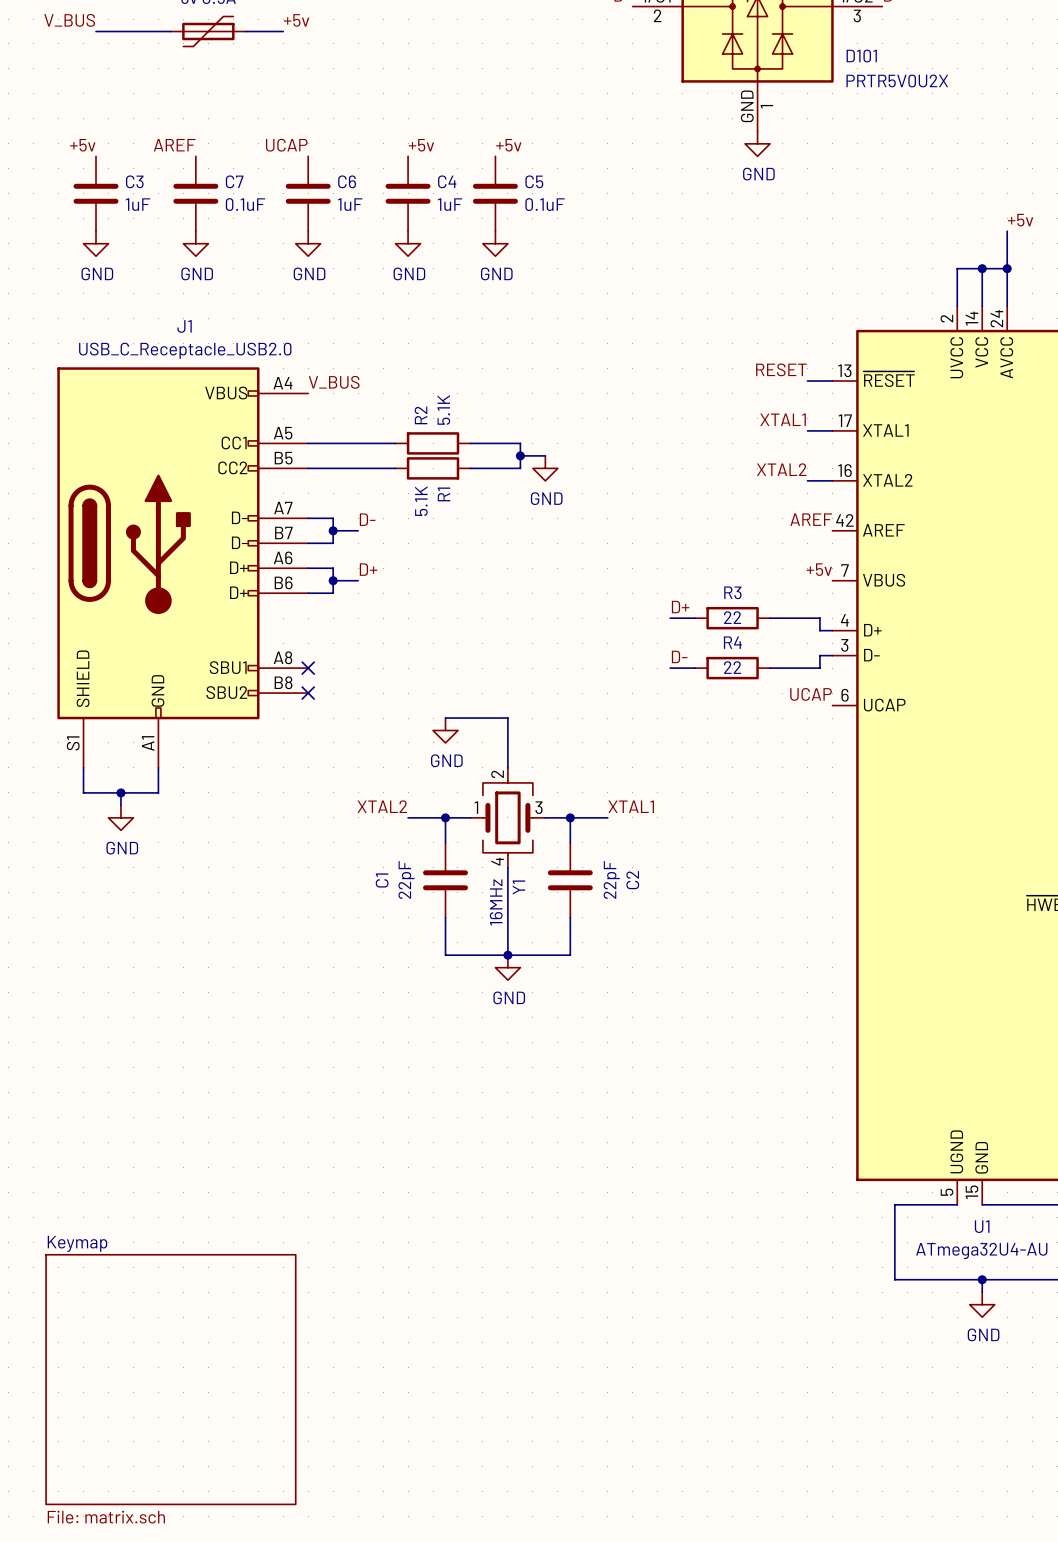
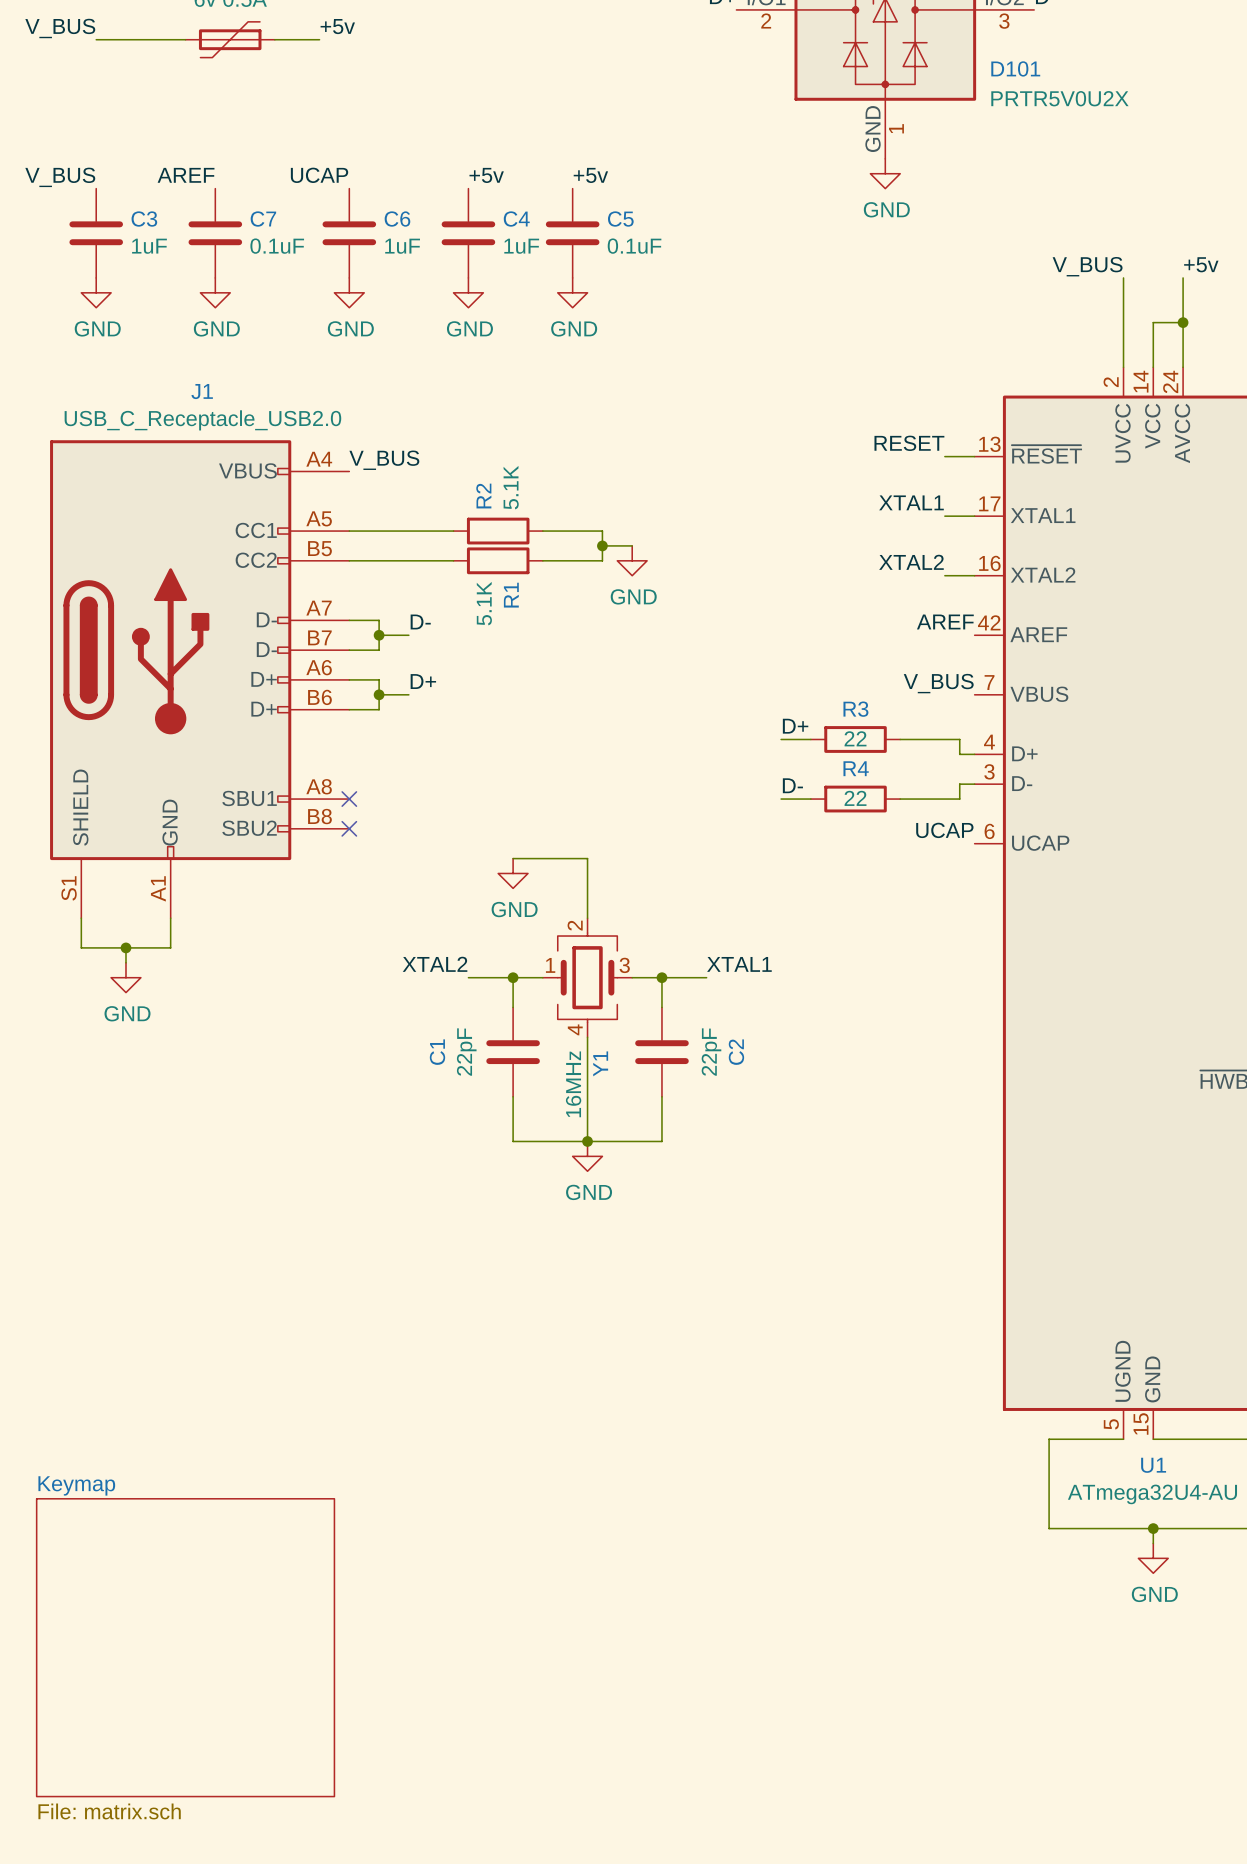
label: +5v (82, 145) -> V_BUS (60, 177)
label: none -> V_BUS (1087, 266)
wire: (957, 268) (982, 268) -> (1123, 322) (1123, 277)
junction: (982, 268) -> none
label: +5v (819, 569) -> V_BUS (938, 683)

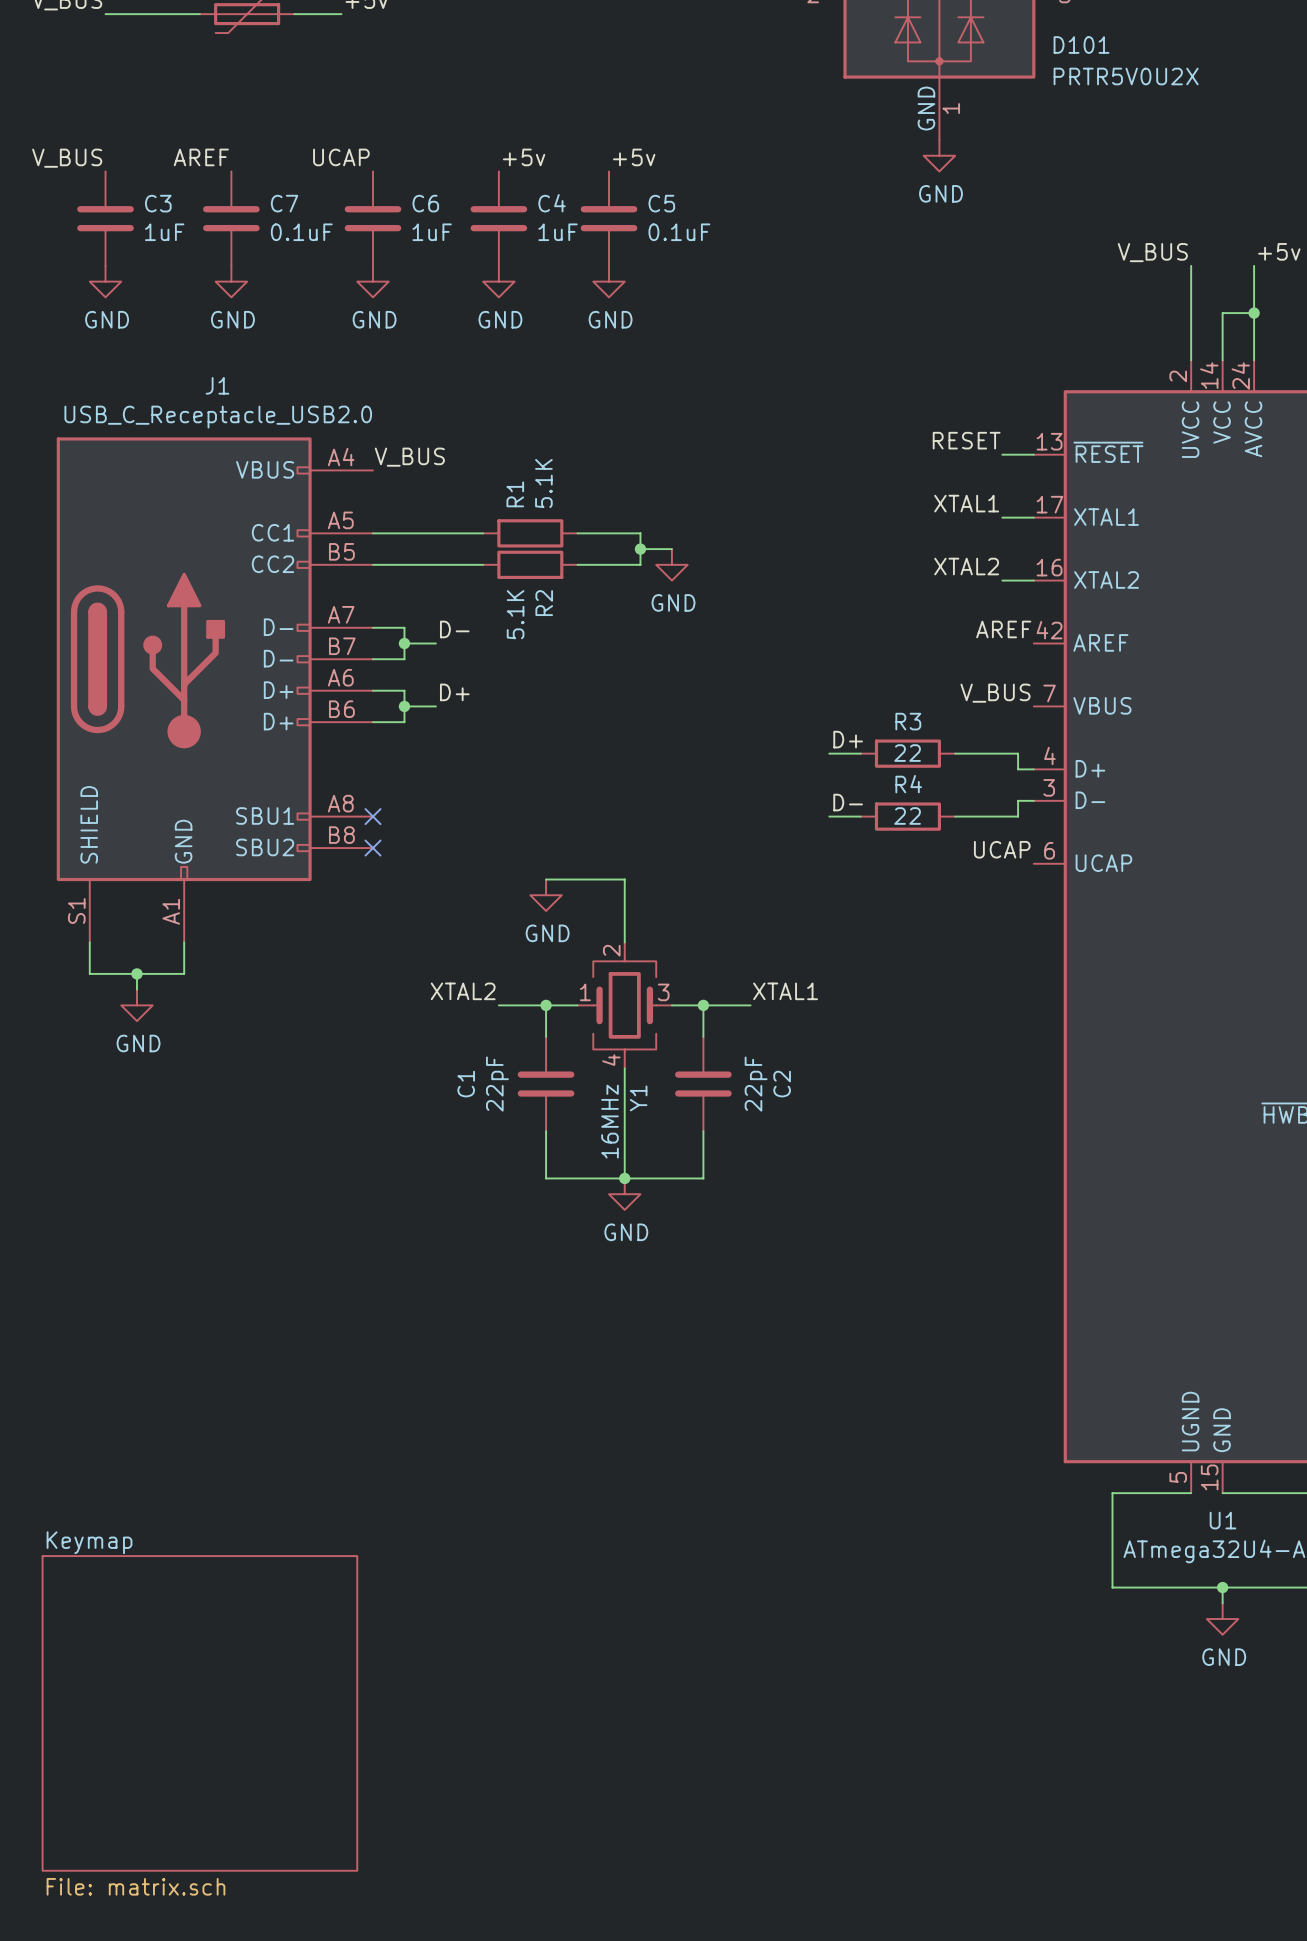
R2 name: R2 (483, 496) -> R1 (515, 494)
R1 name: R1 (511, 595) -> R2 (544, 603)

